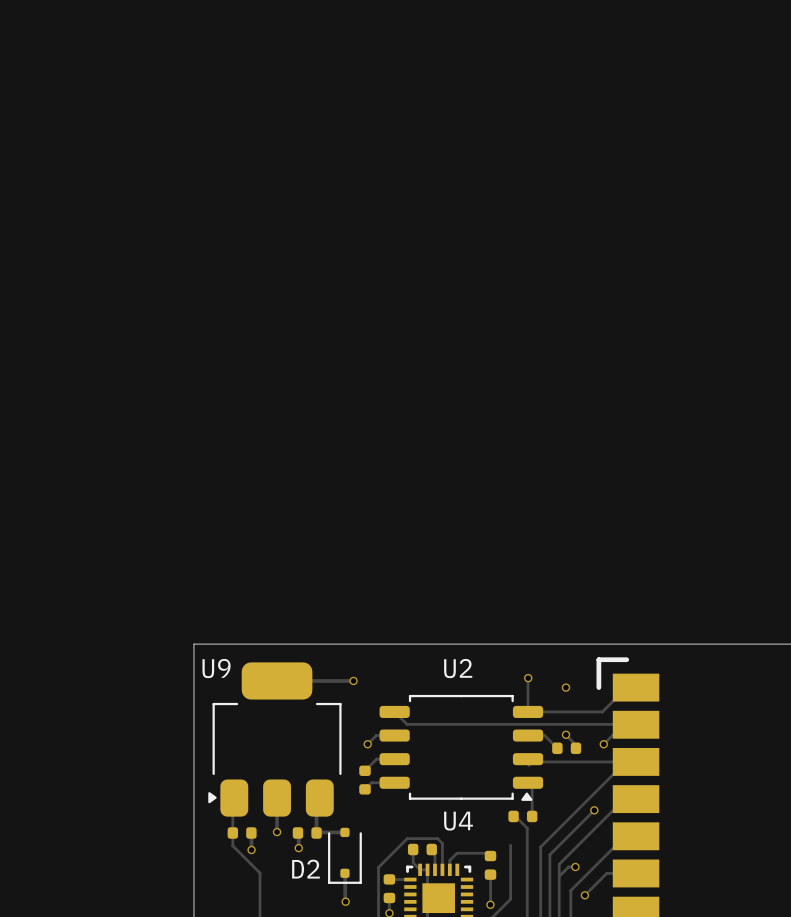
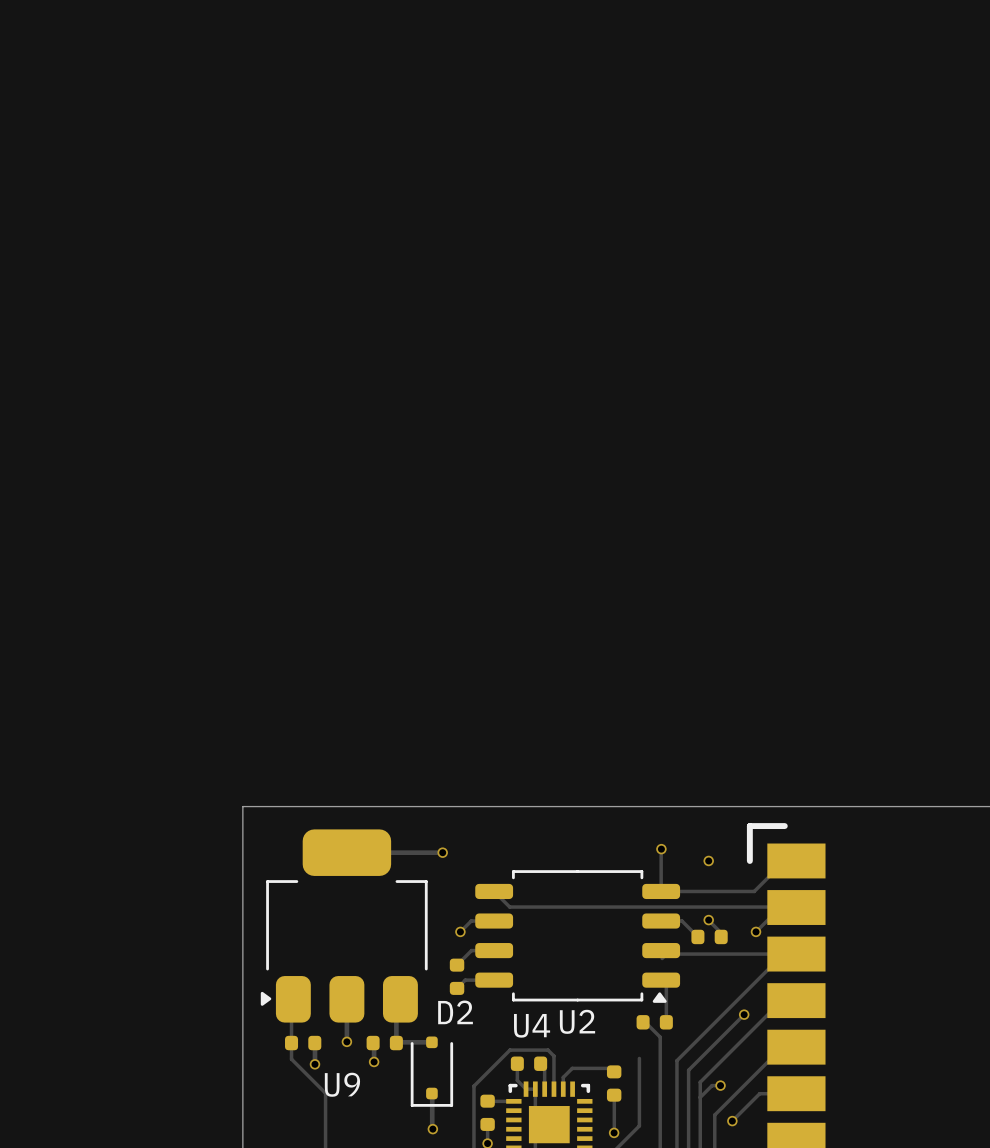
U9 name position: U9 (216, 668) -> U9 (342, 1084)
U2 name position: U2 (458, 668) -> U2 (577, 1021)
text position: U4 (458, 821) -> U4 (532, 1025)
D2 name position: D2 (305, 869) -> D2 (455, 1012)

